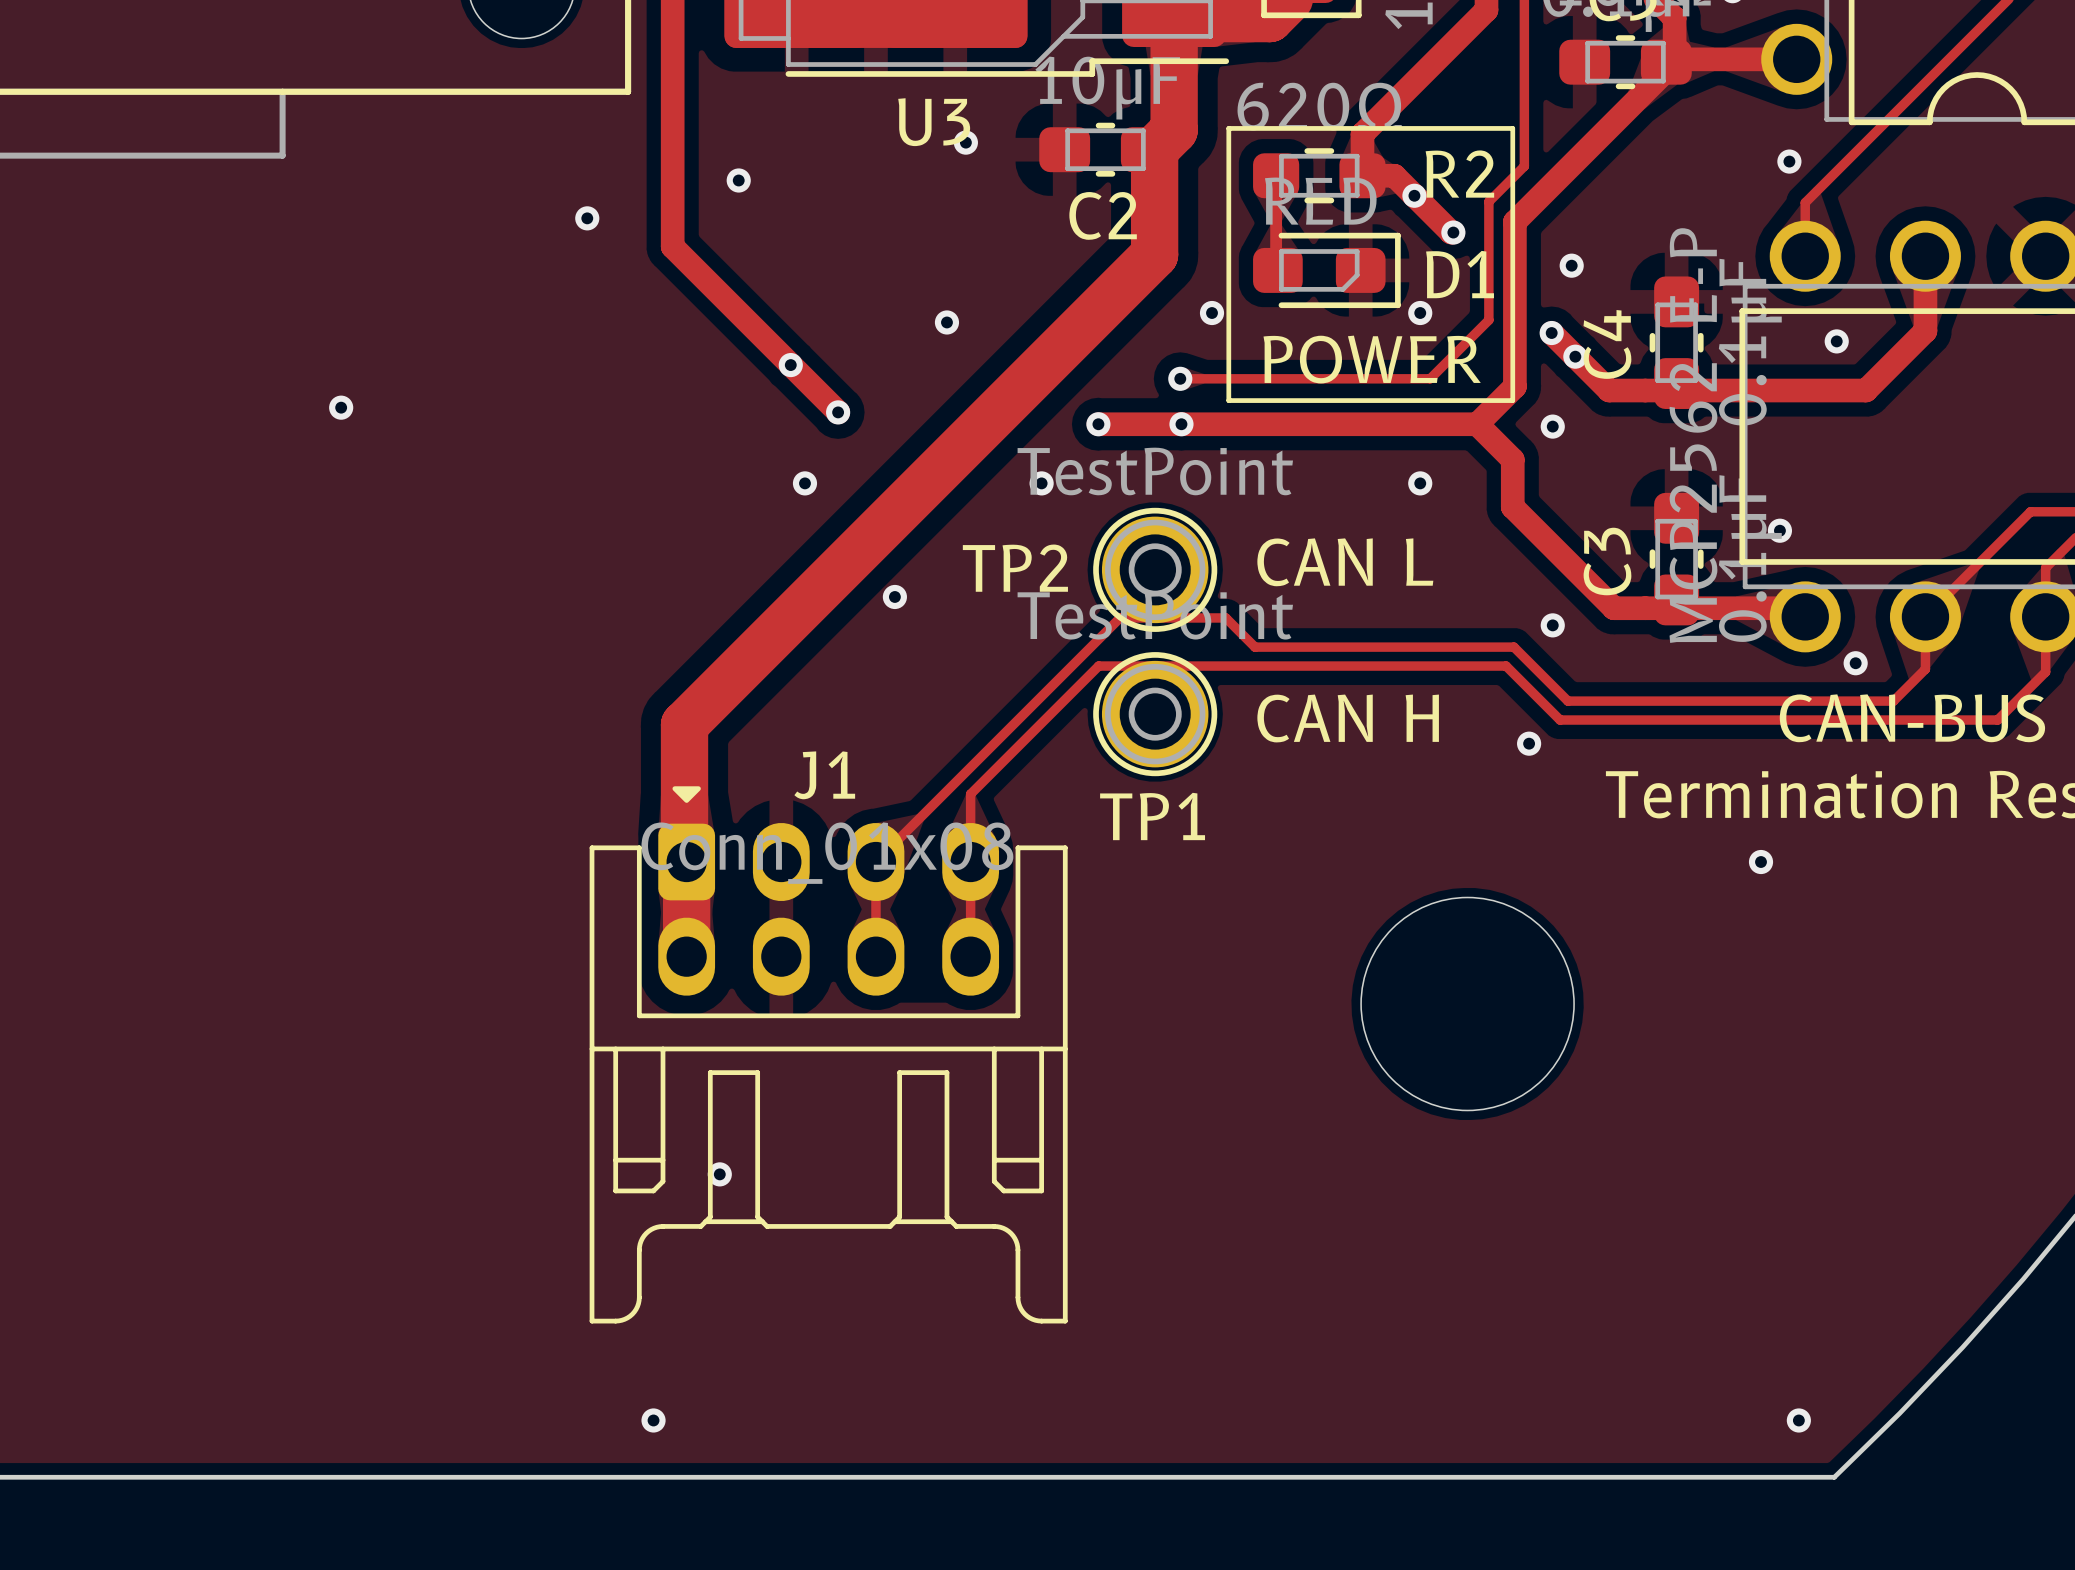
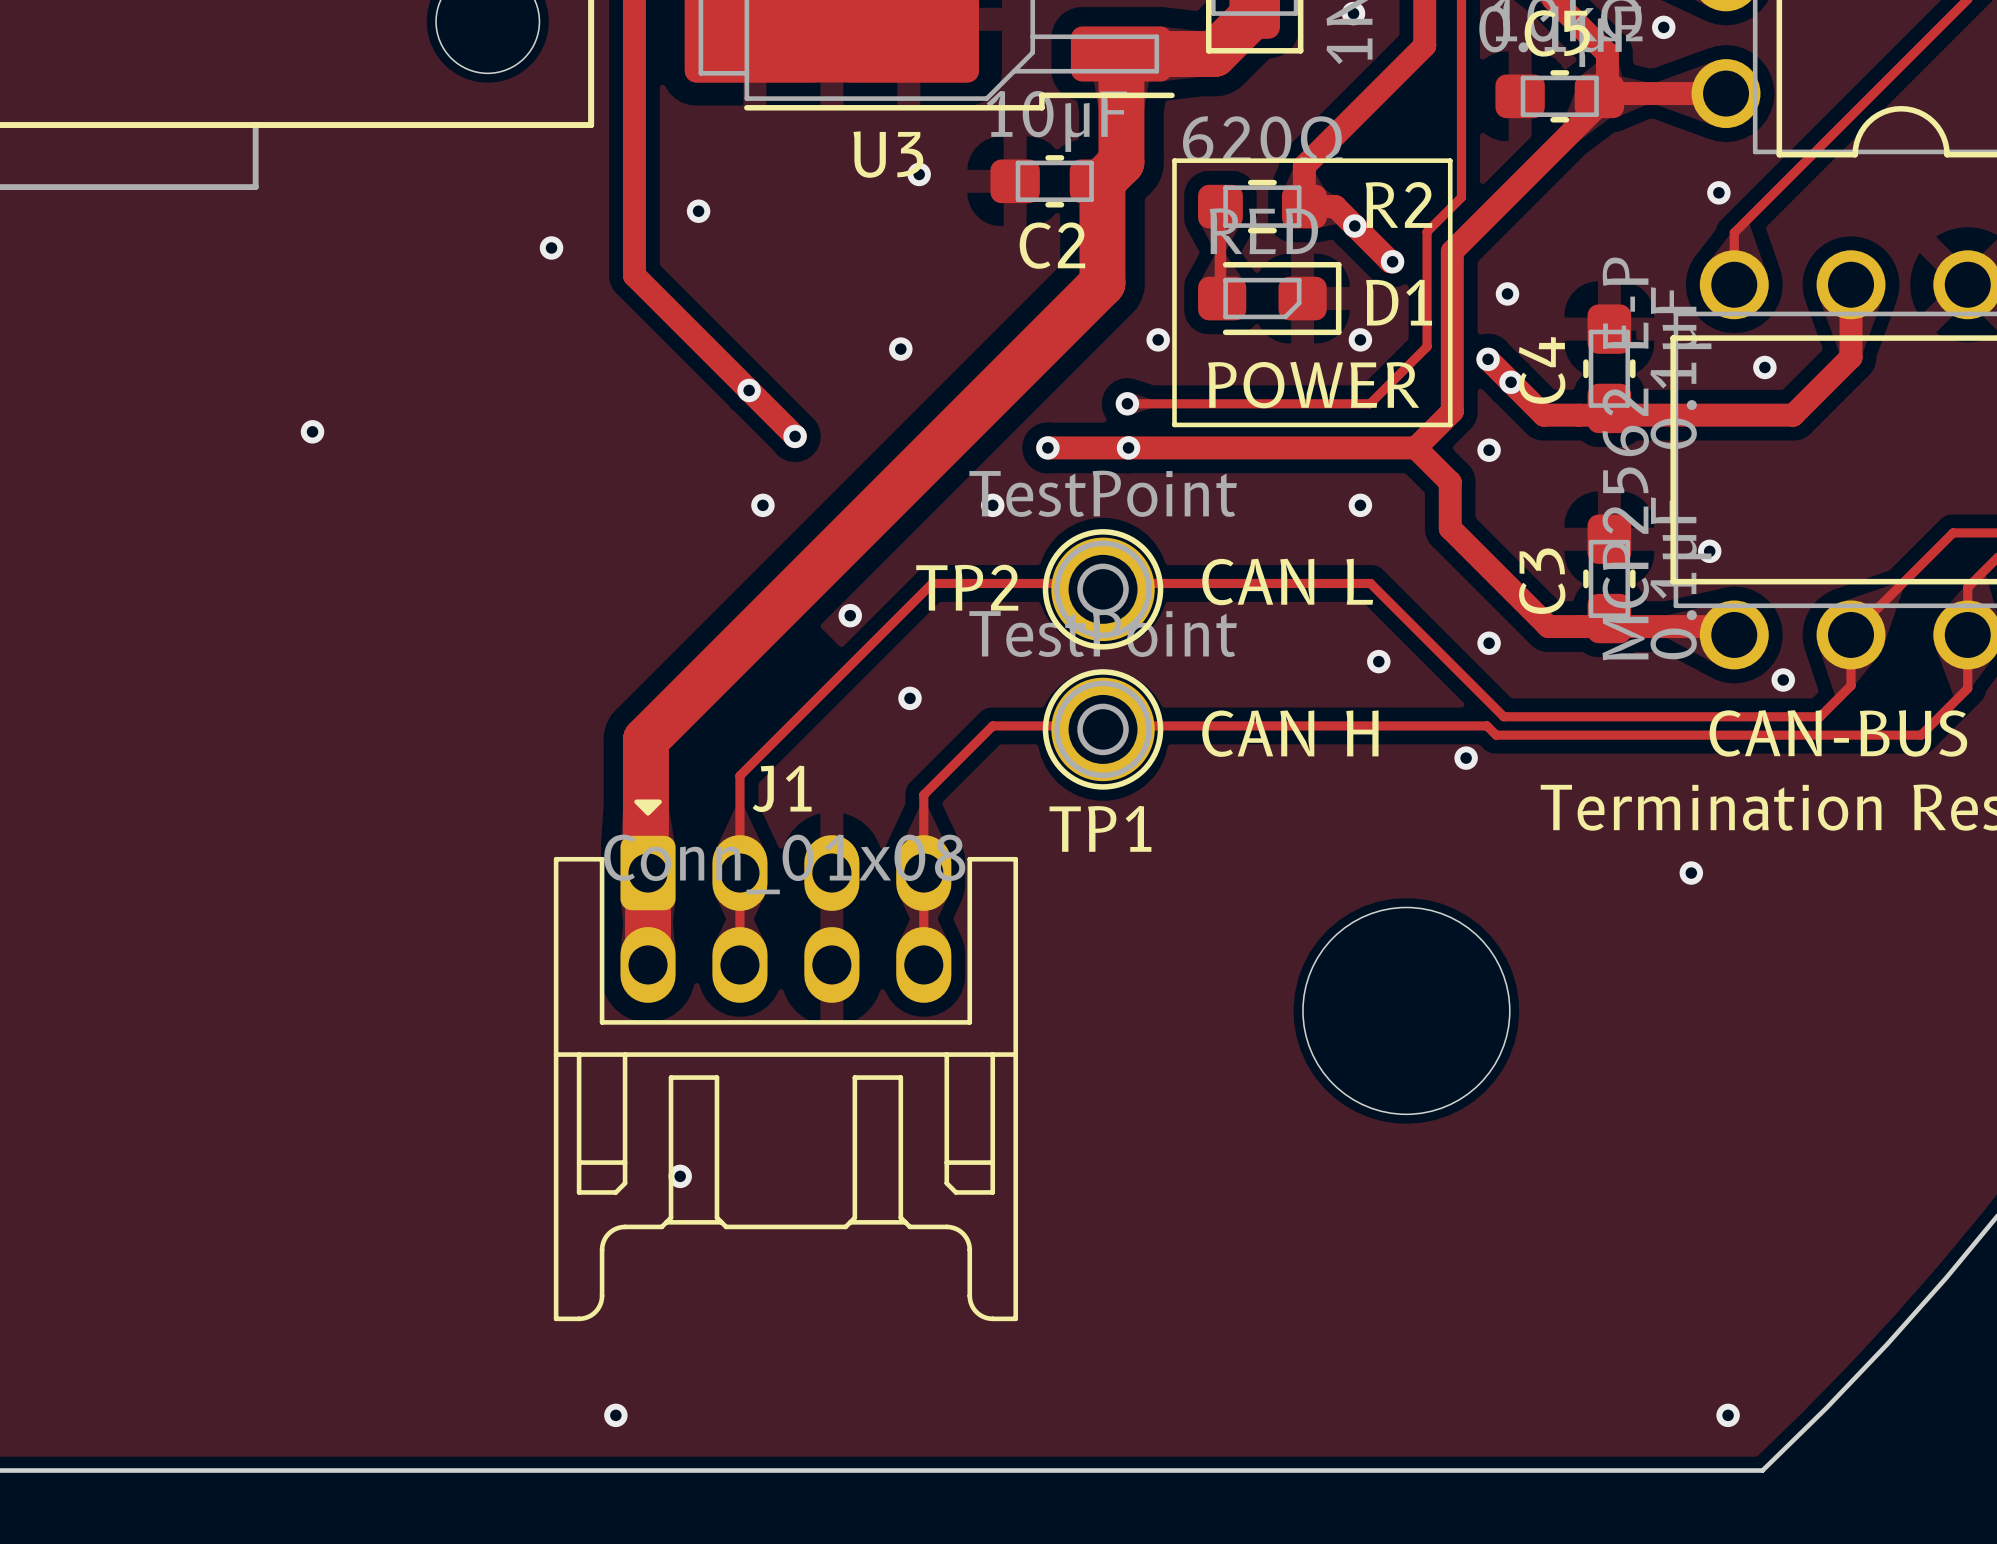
via: none -> (1378, 661)
track: (1513, 647) (1254, 647) (1225, 617) (1120, 617) (875, 862) (875, 956) -> (1451, 664) (1370, 583) (932, 583) (739, 775) (739, 964)
via: none -> (910, 698)
track: (1550, 710) (1506, 666) (1098, 666) (970, 794) -> (1486, 725) (992, 725) (923, 794) (923, 807)

